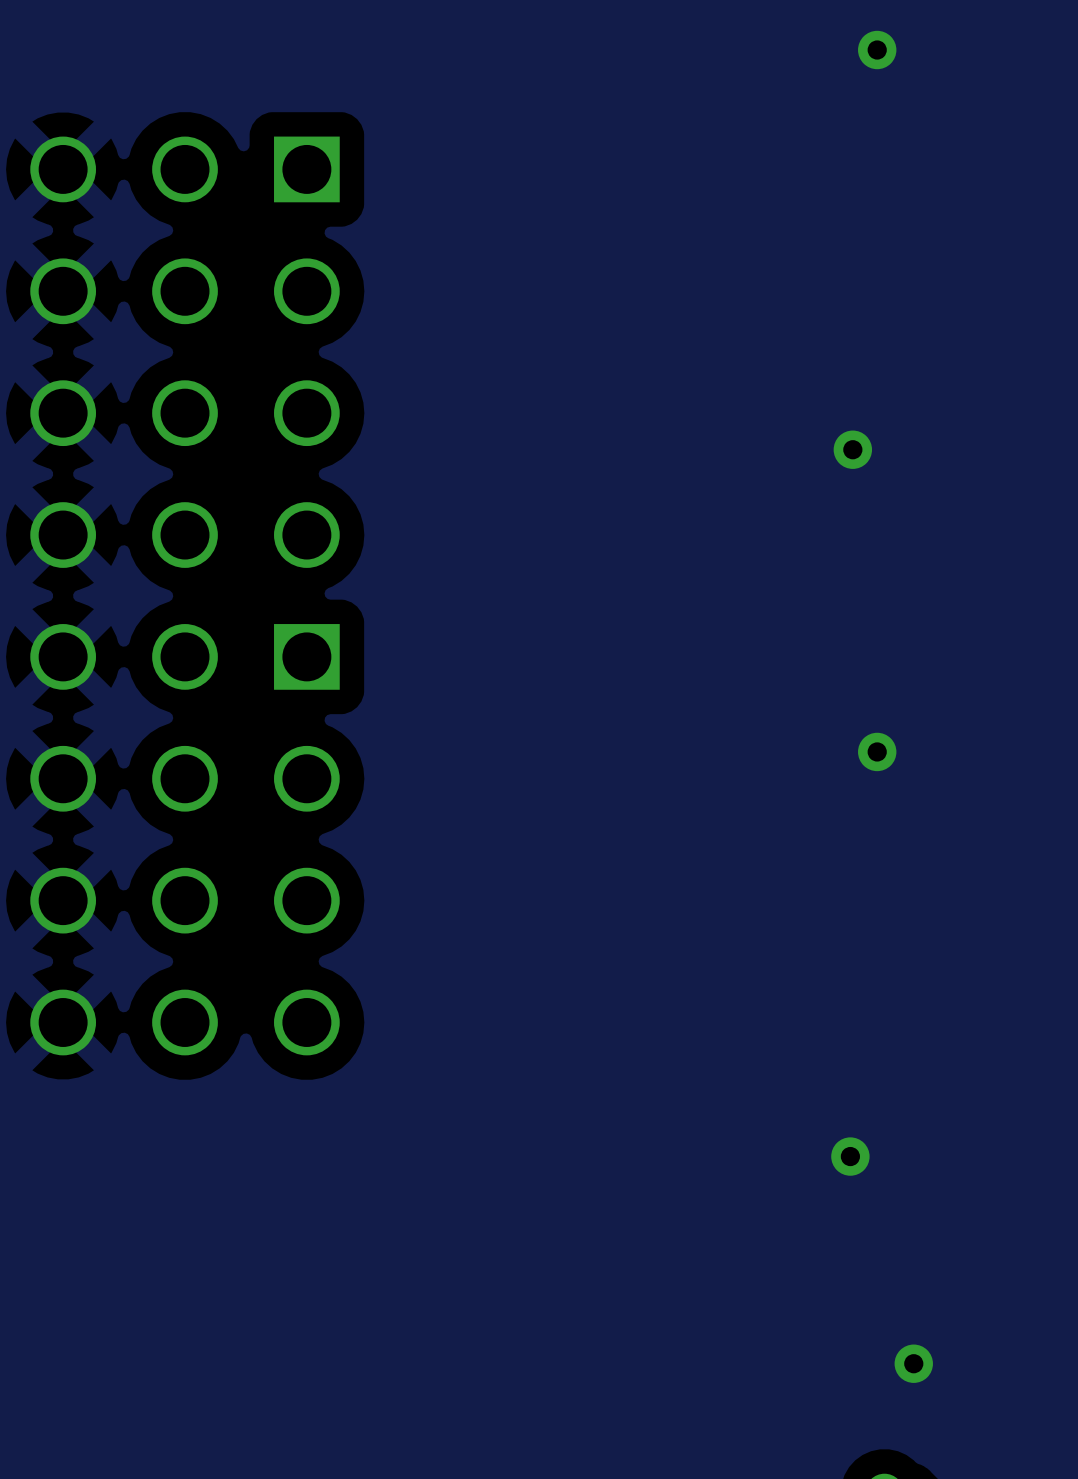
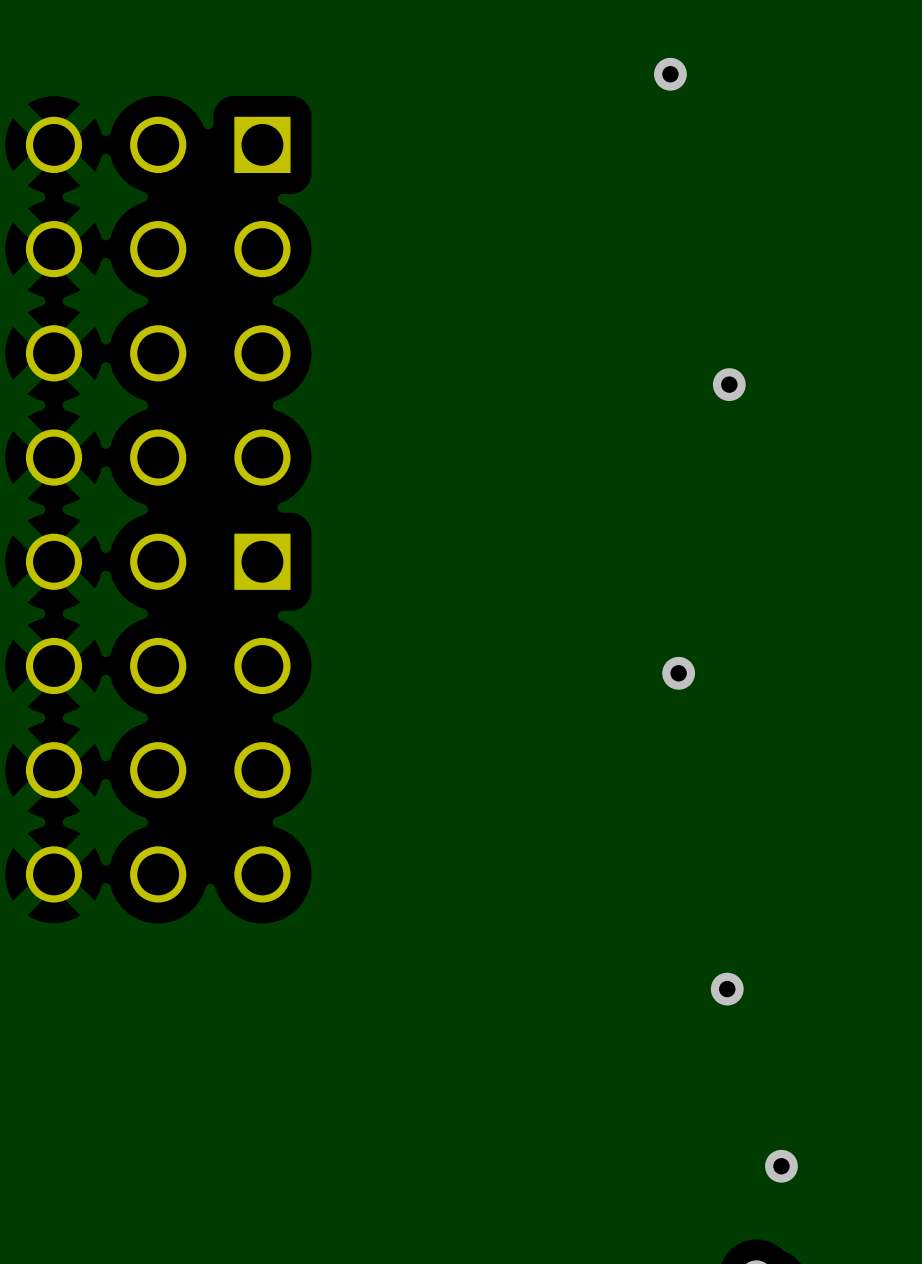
via position: (877, 50) -> (670, 74)
via position: (877, 751) -> (678, 673)

